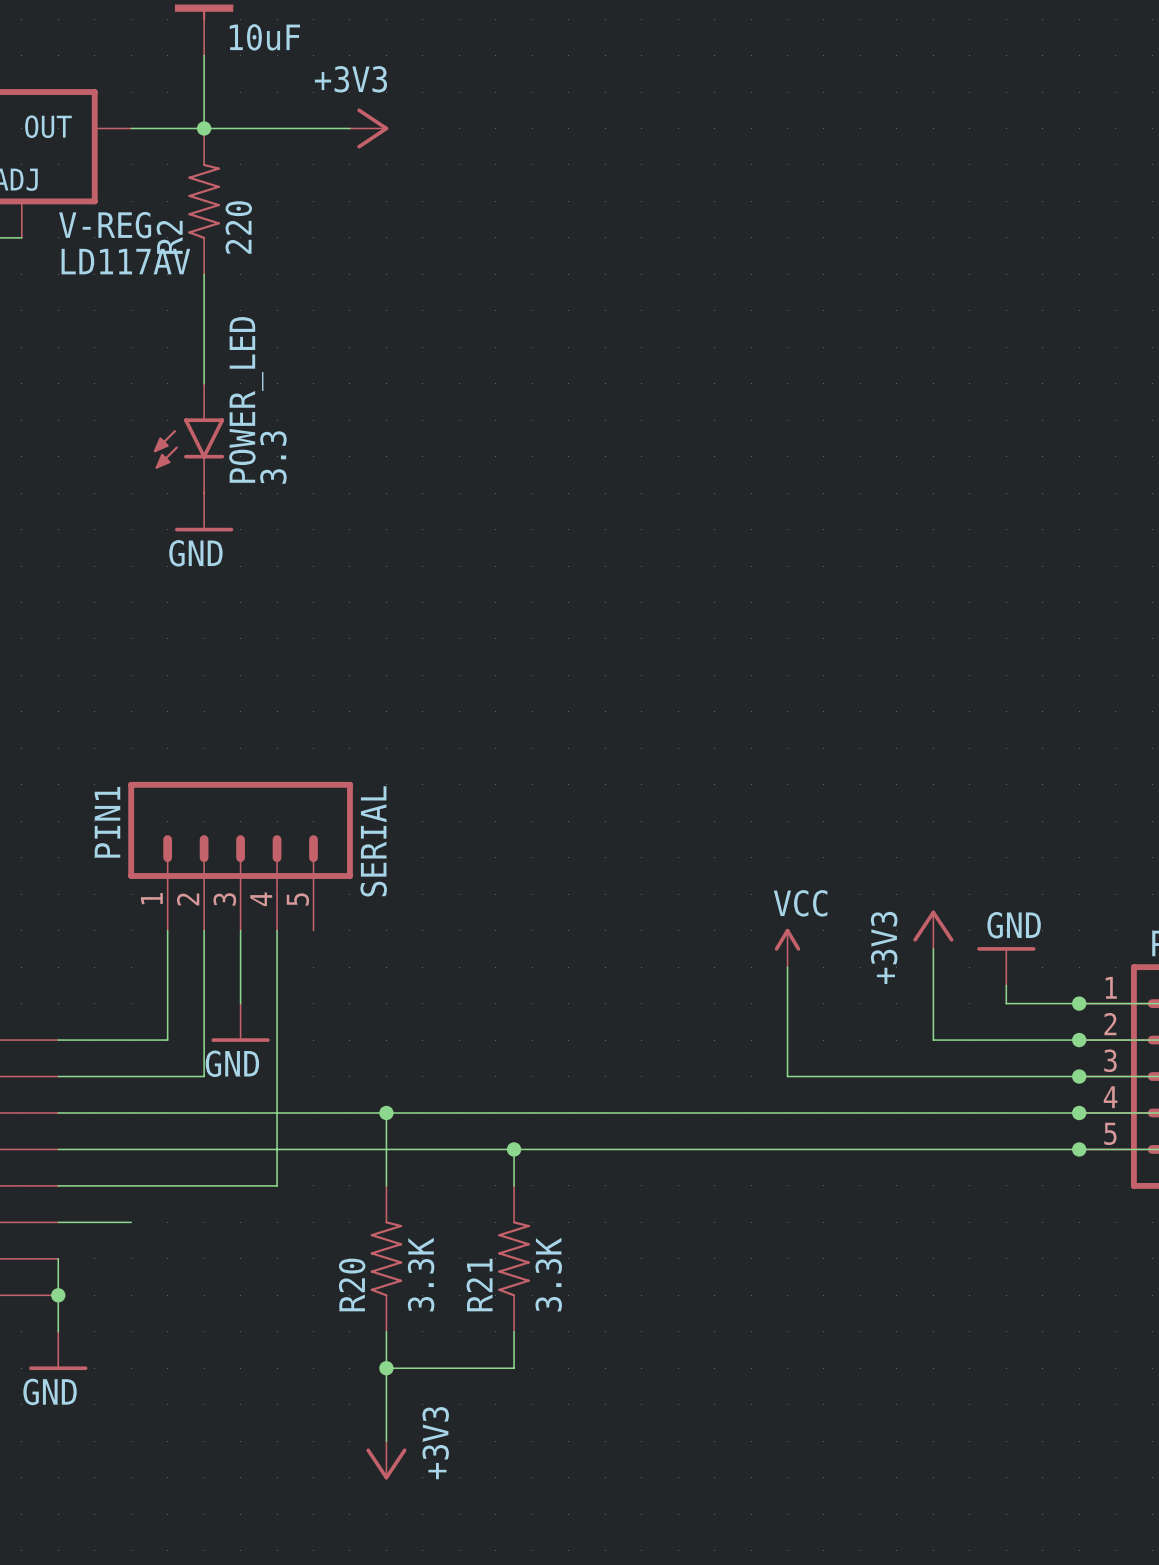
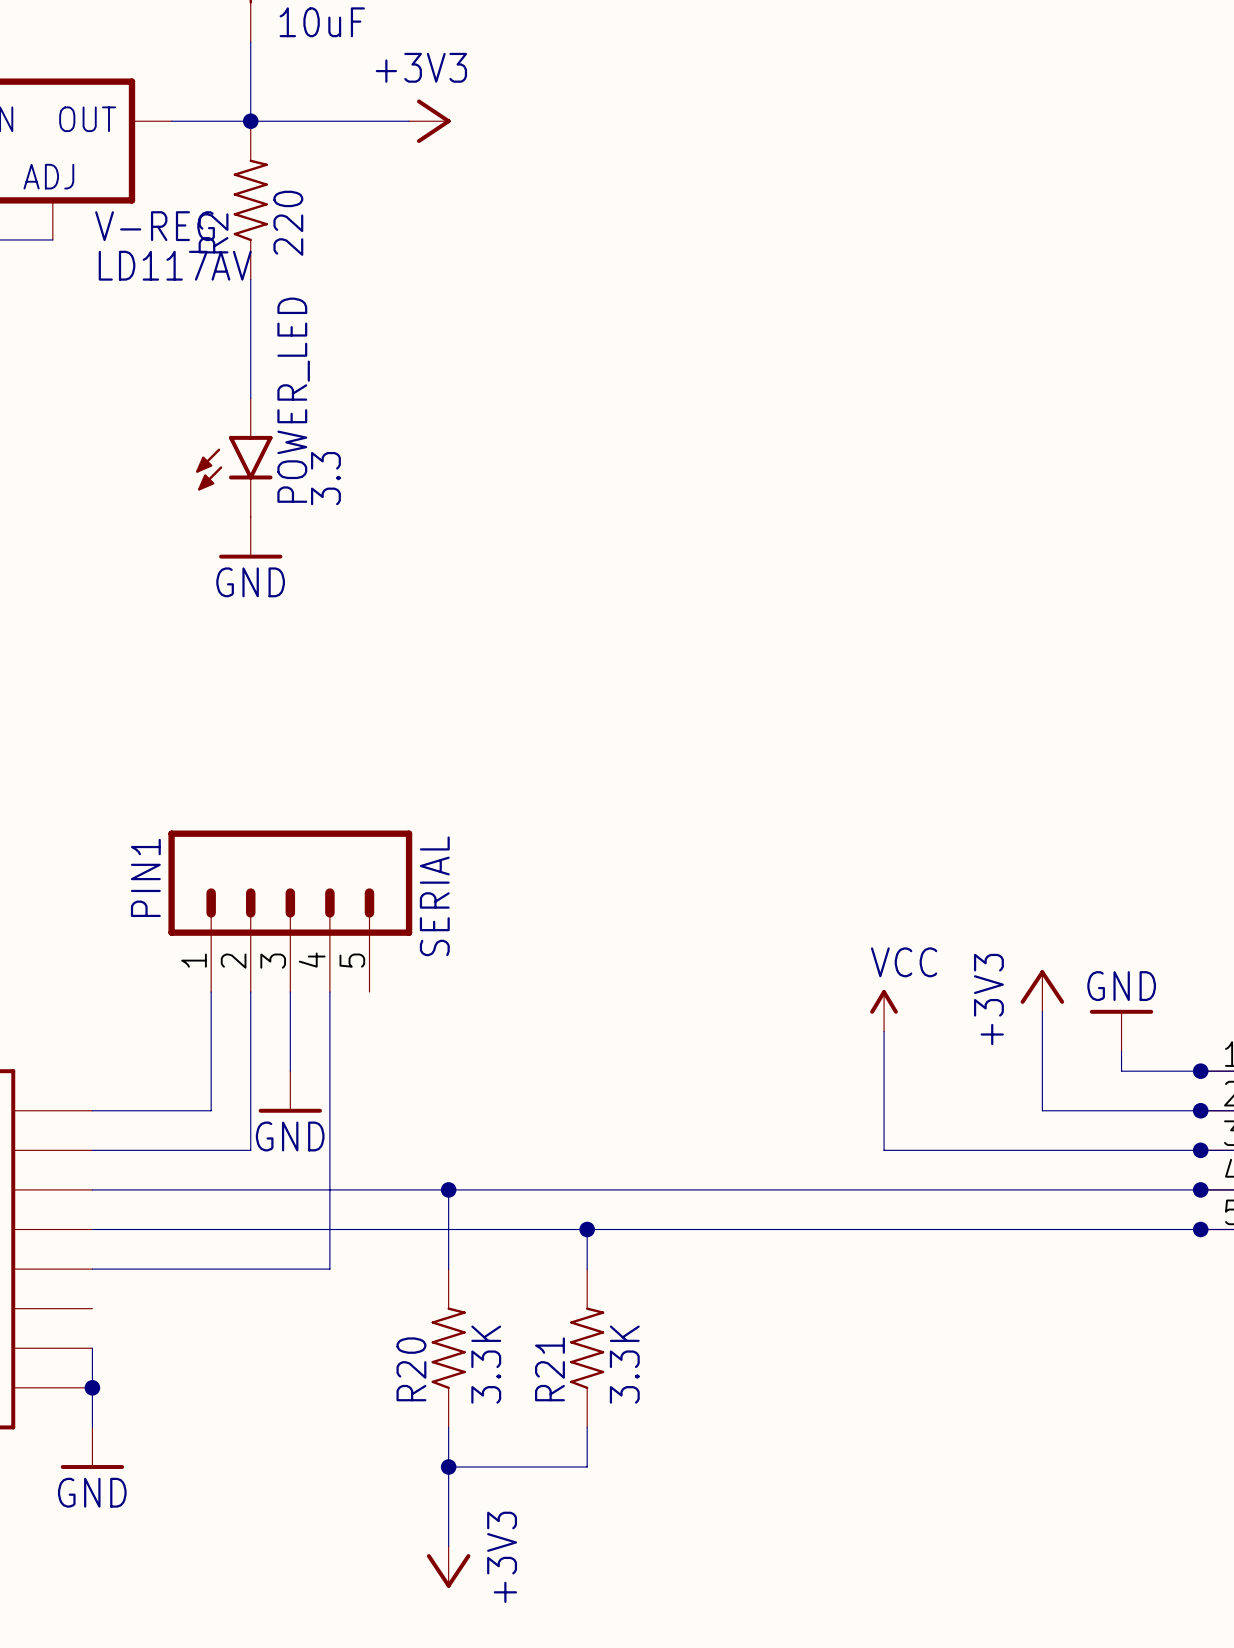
wire: (58, 1222) (131, 1222) -> none

